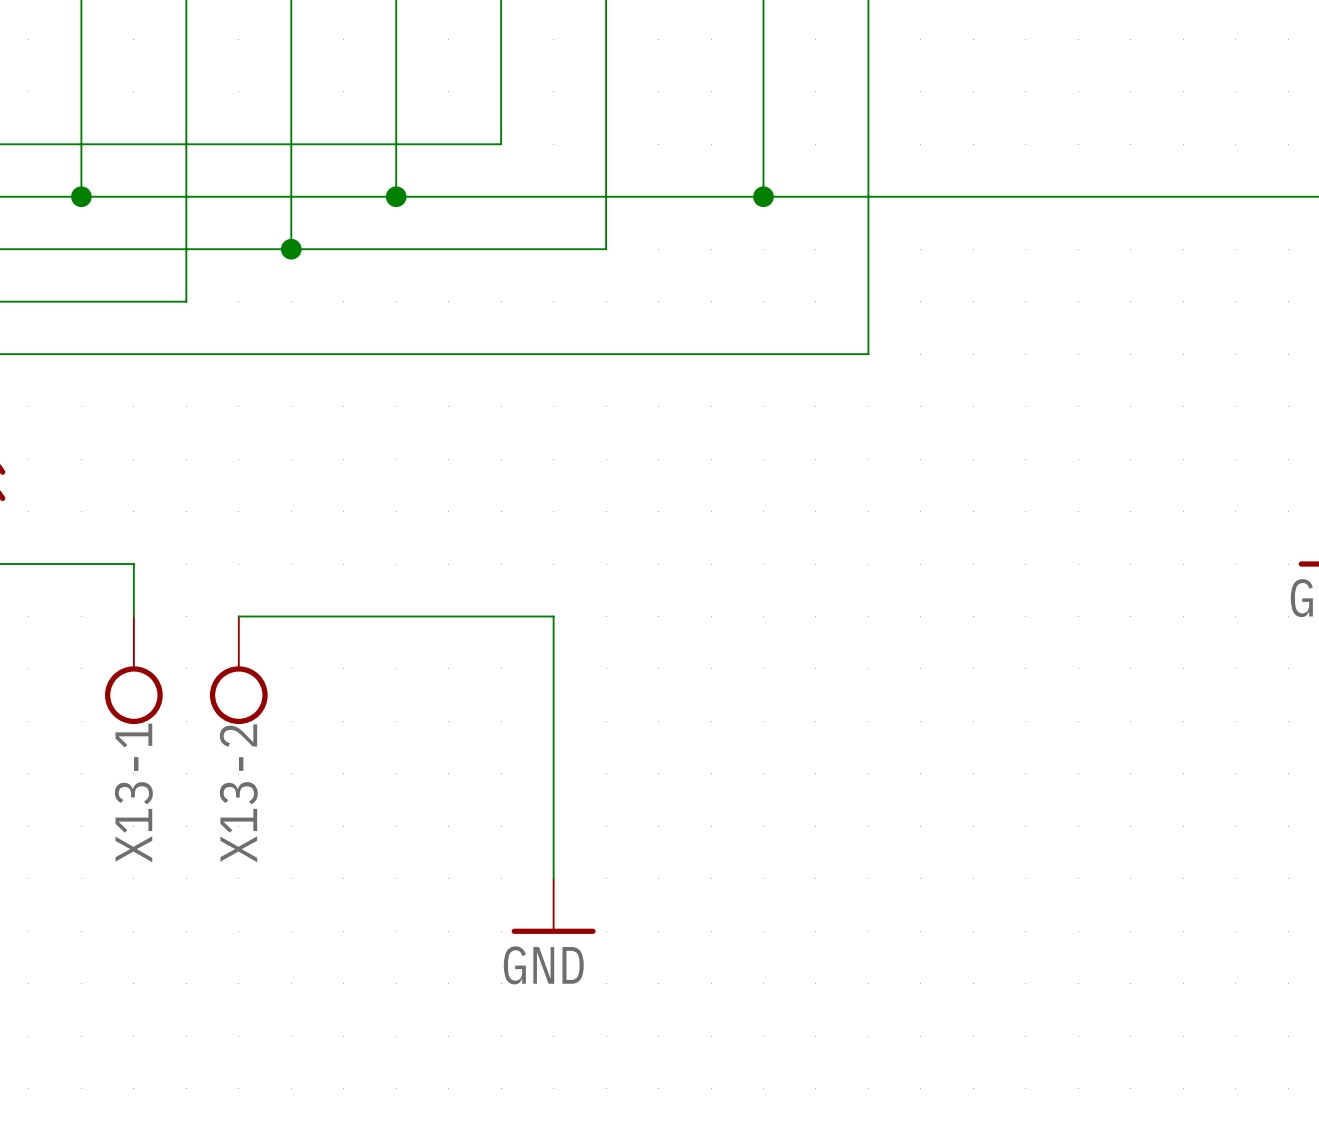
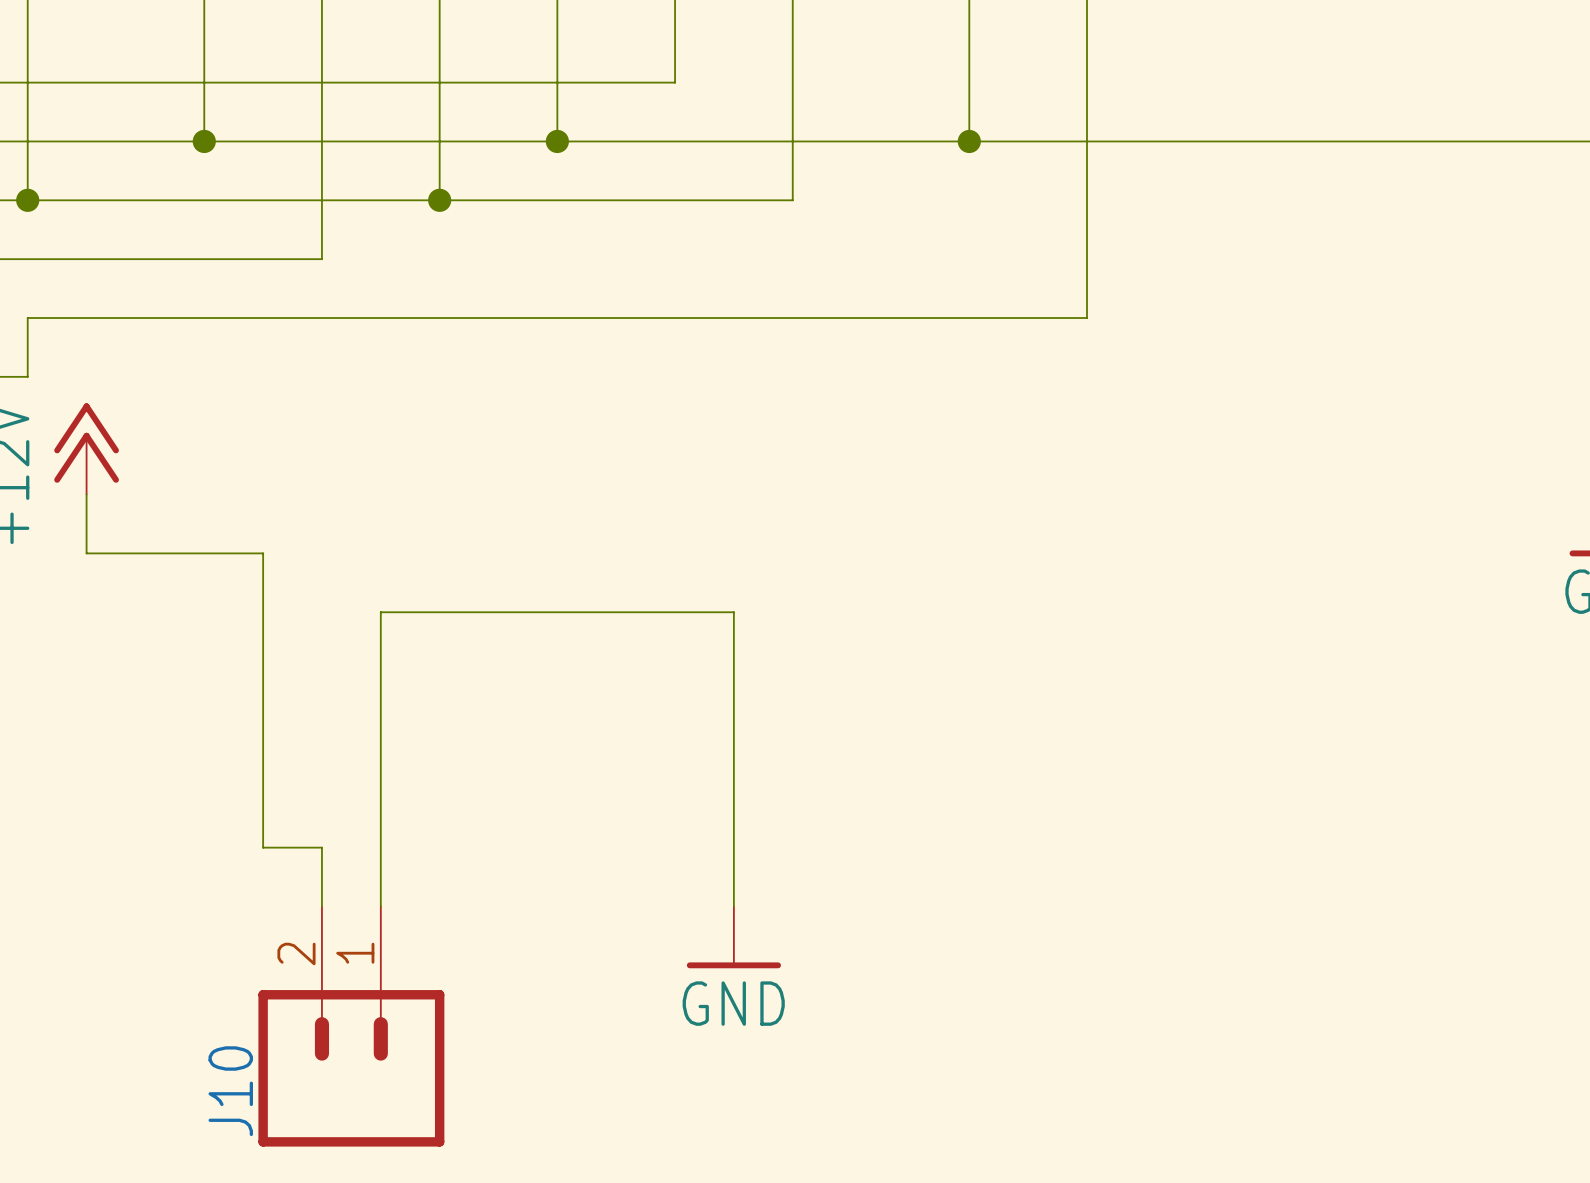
wire: none -> (263, 612) (263, 847) (321, 847) (321, 906)
wire: none -> (380, 612) (380, 906)
X13-1: (133, 670) -> none
X13-2: (238, 670) -> none
J10: none -> (351, 1026)

